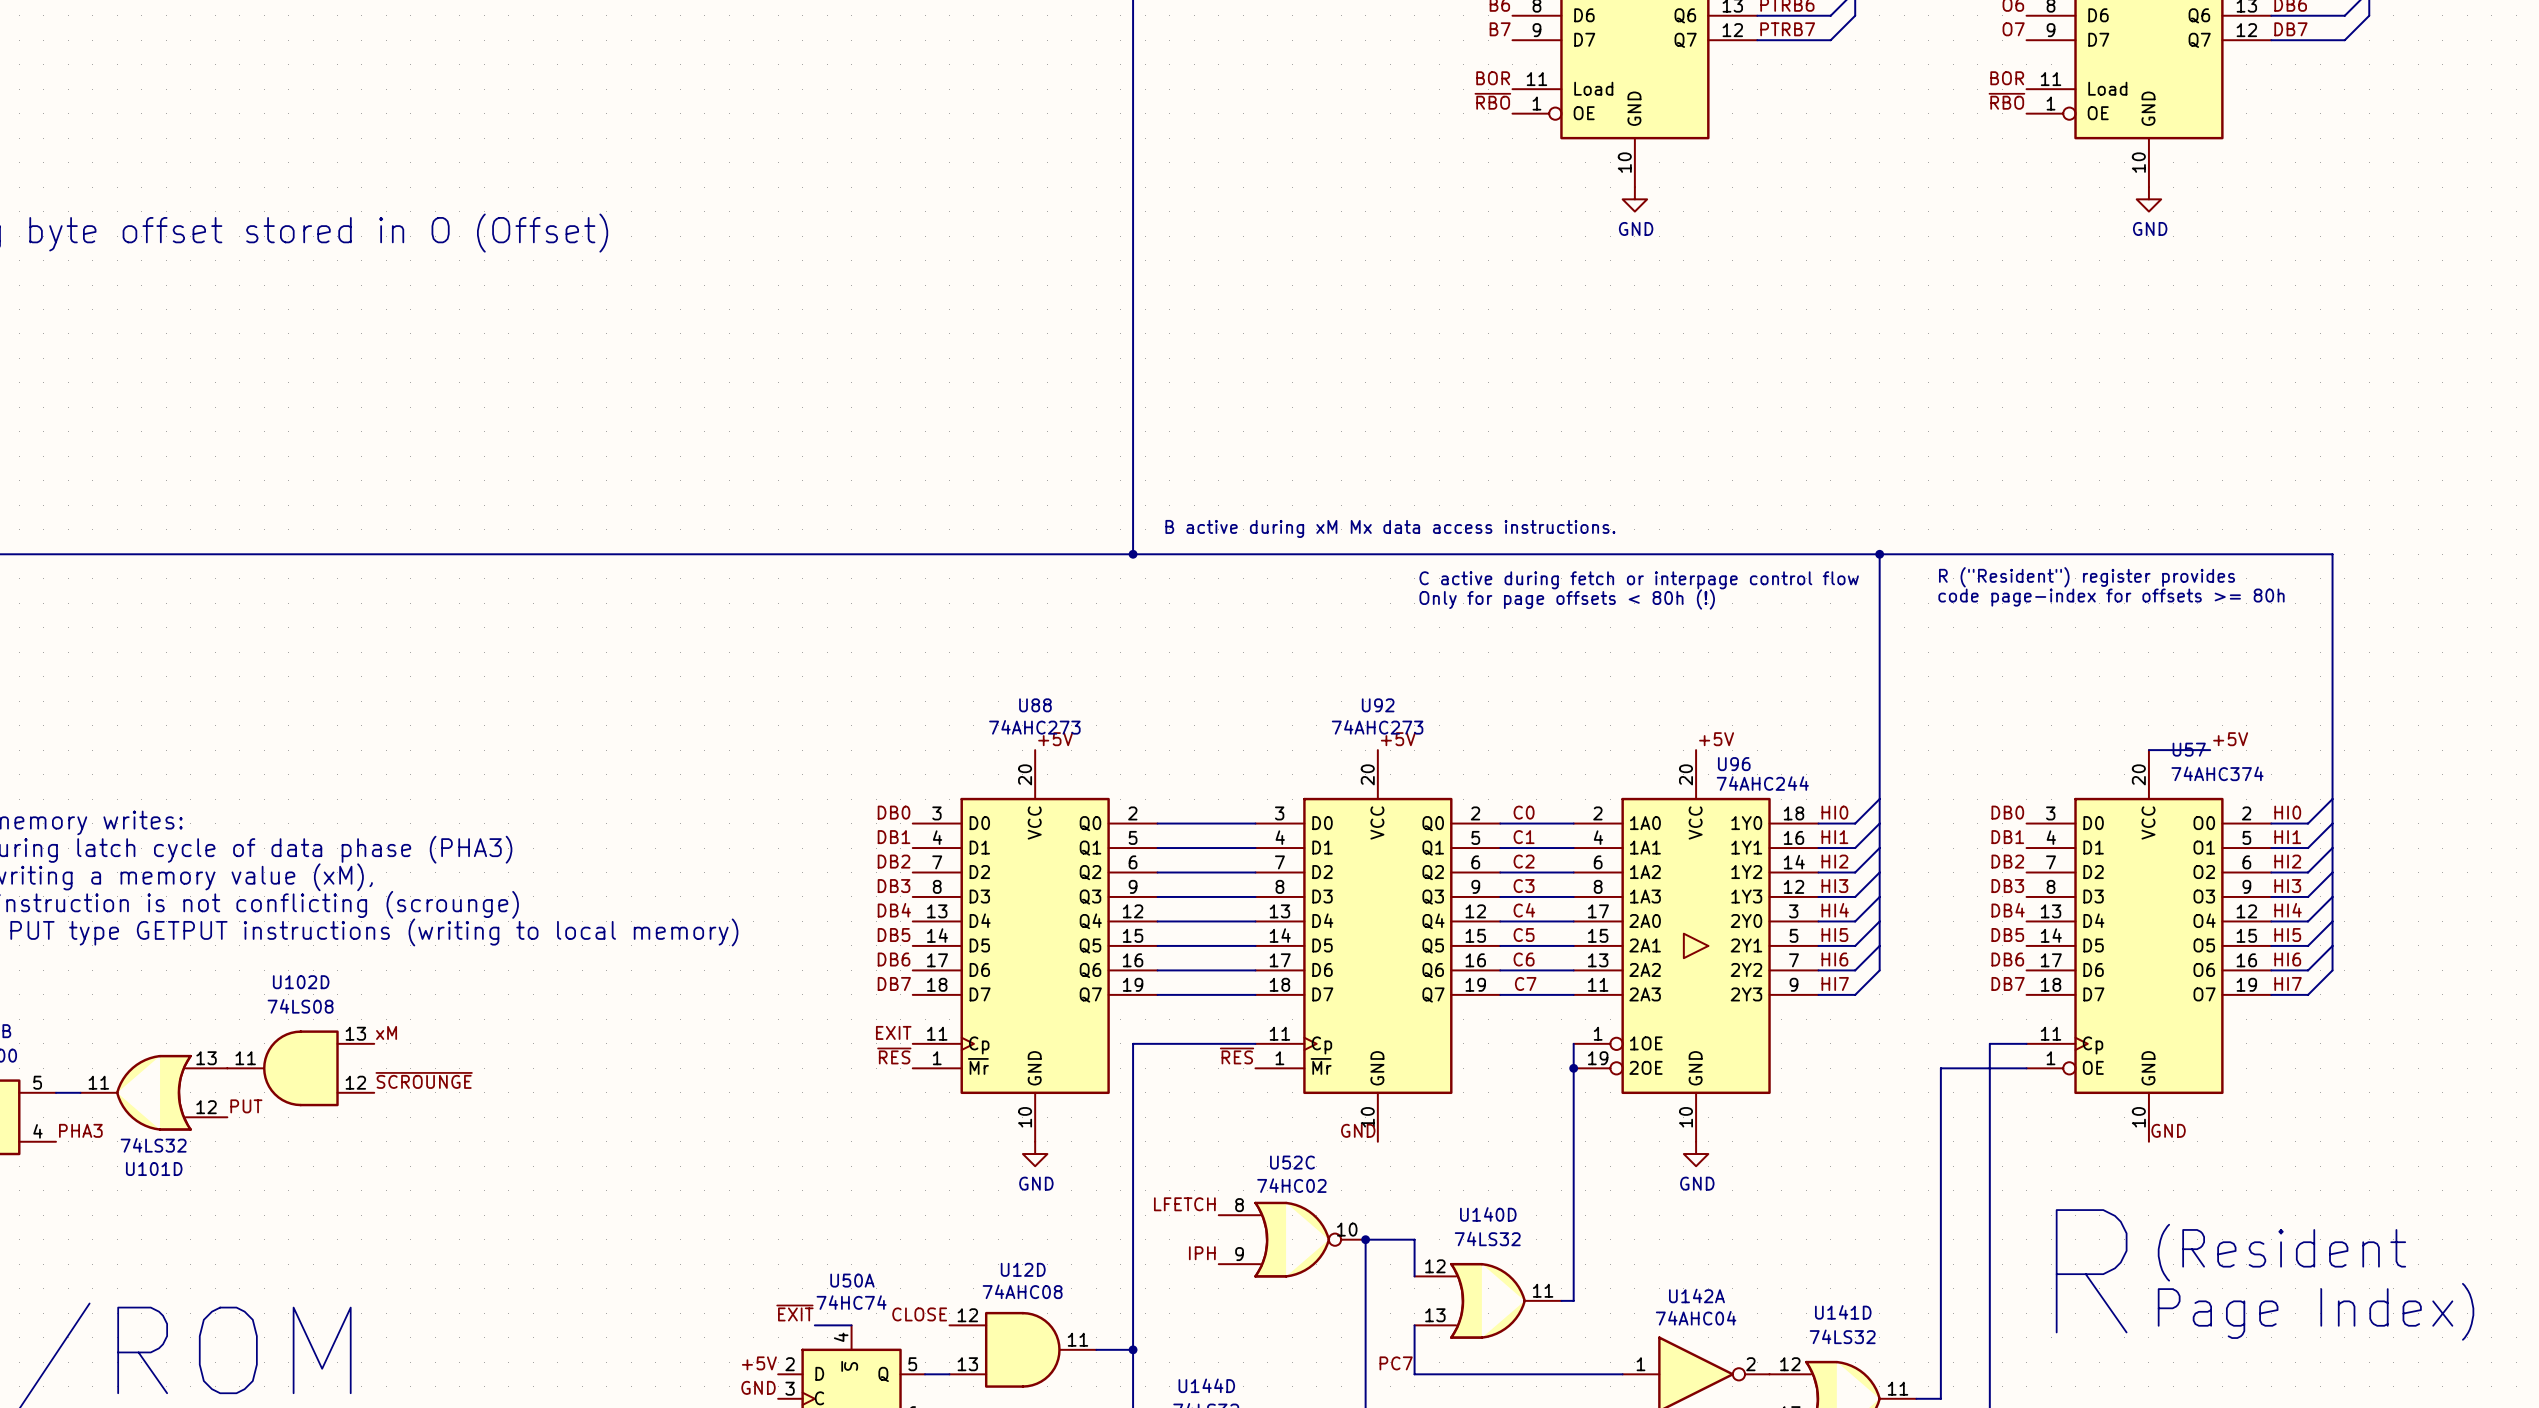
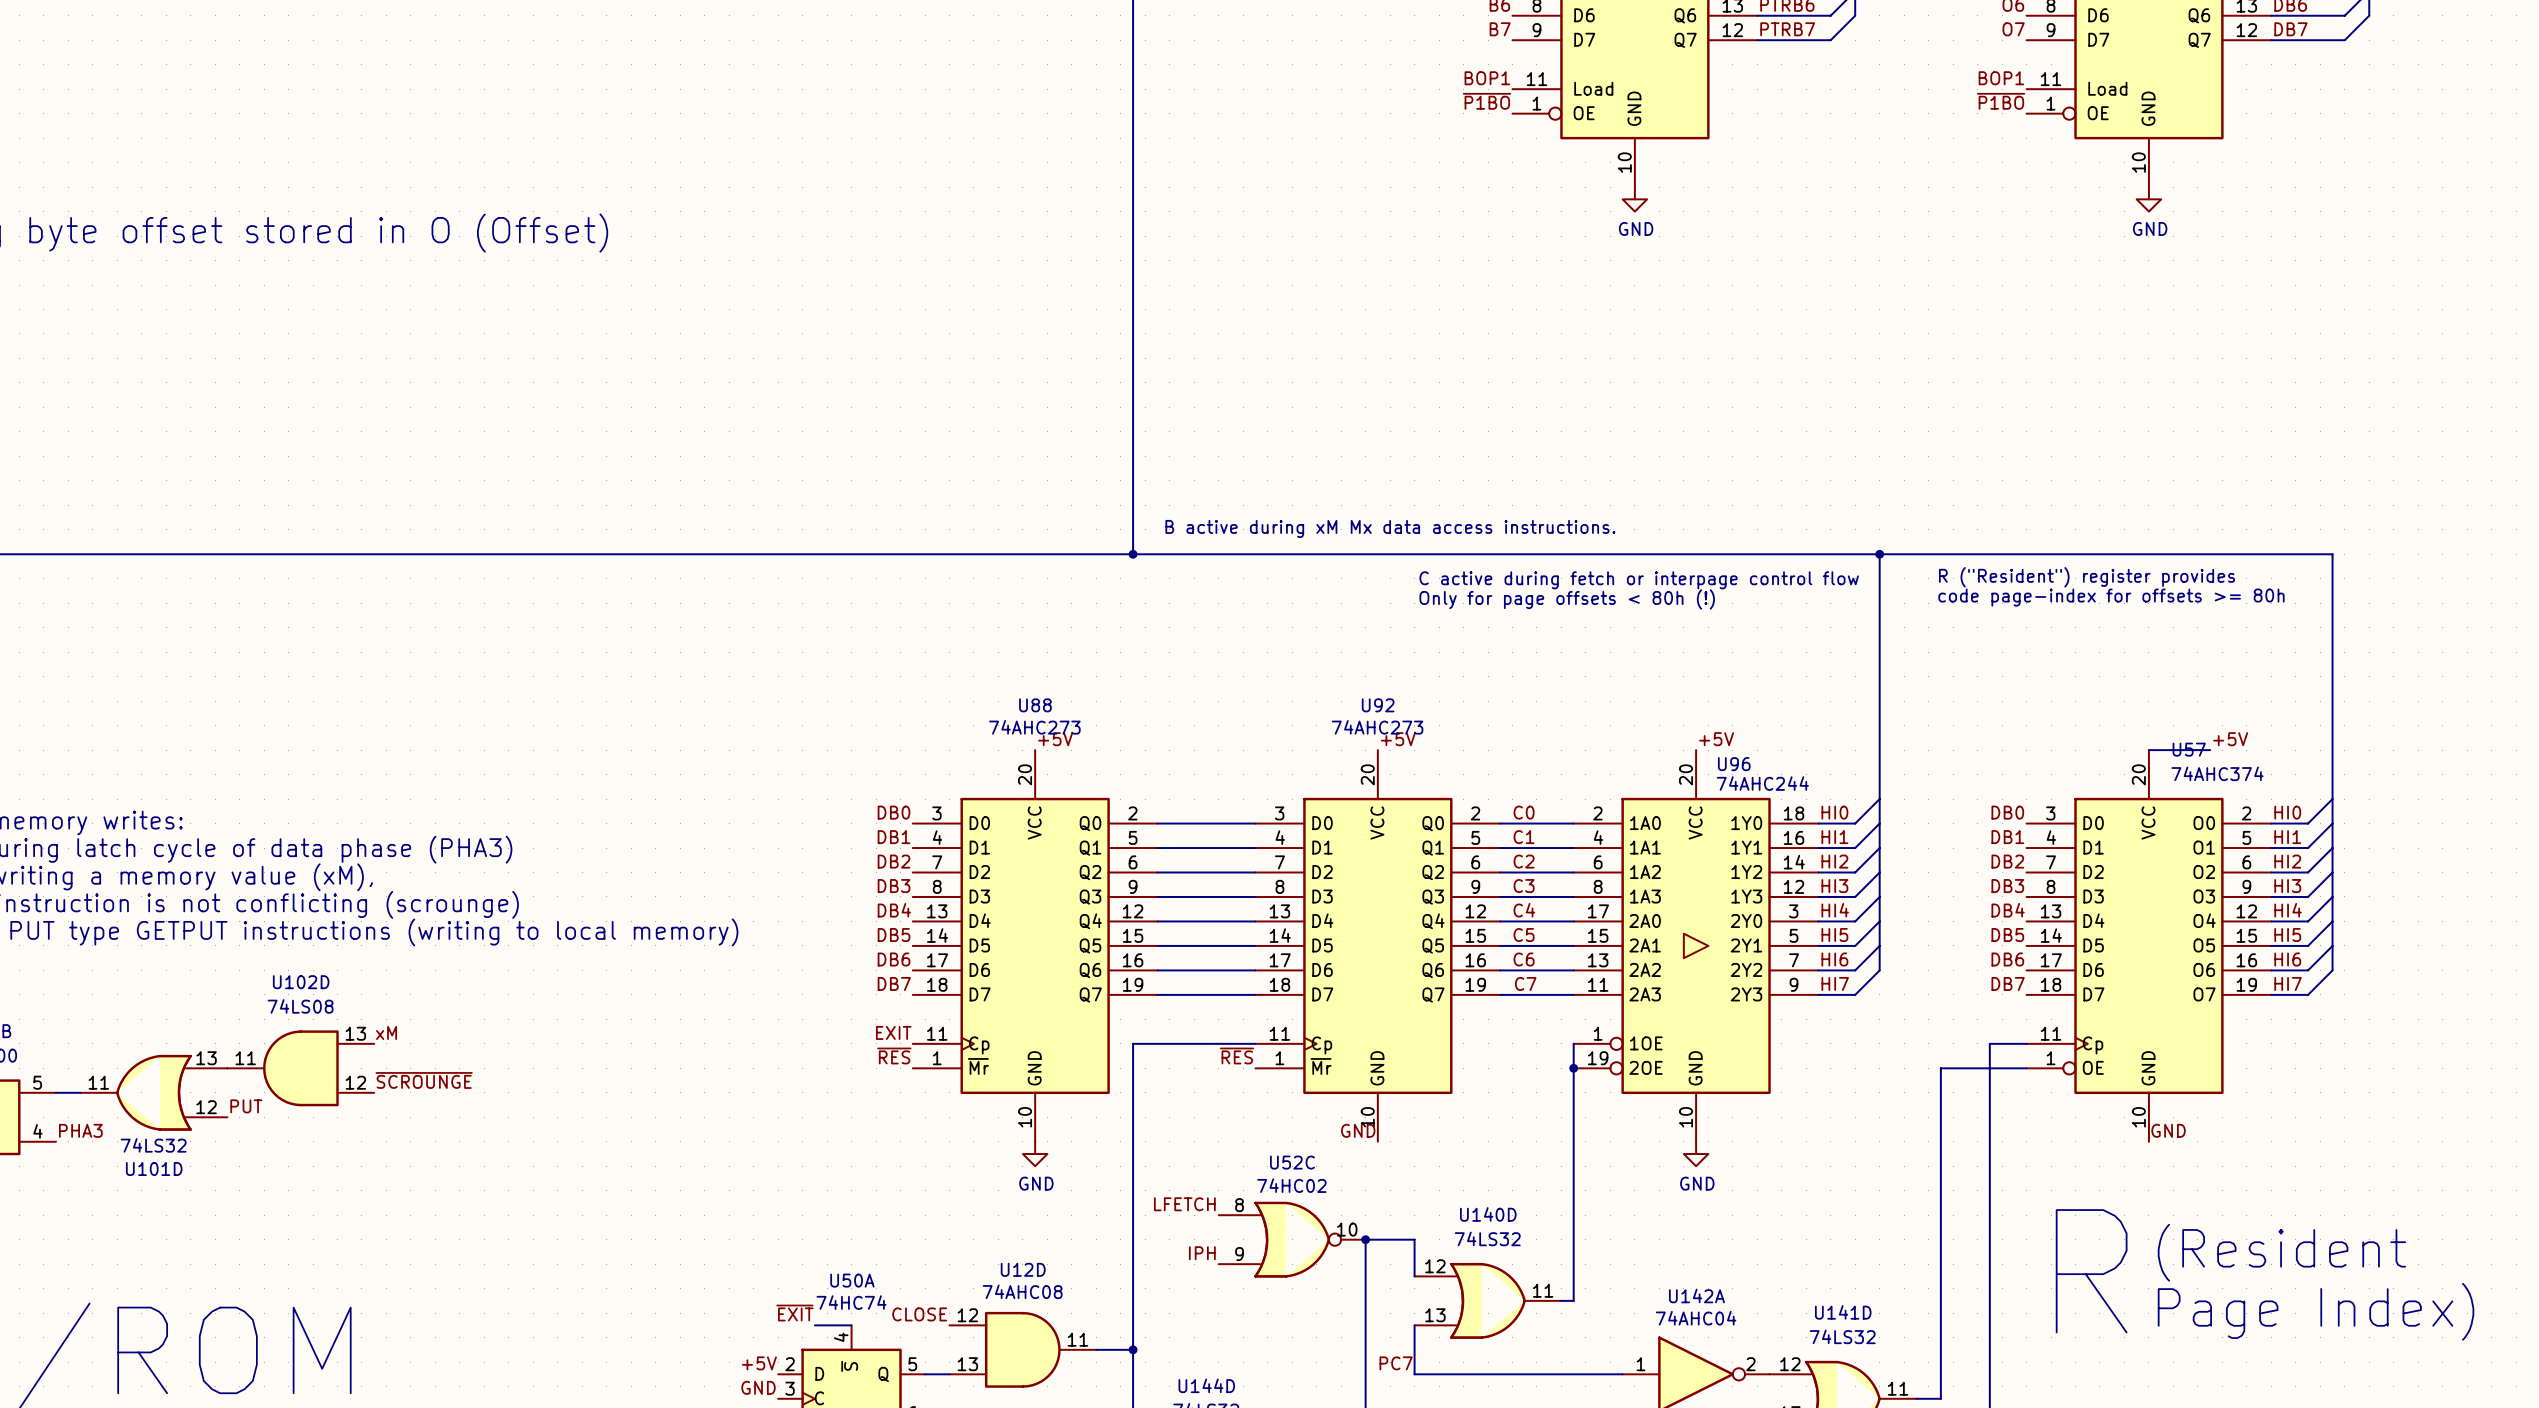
label: BOR (1493, 78) -> BOP1 (1487, 78)
label: BOR (2007, 78) -> BOP1 (2001, 78)
label: ~{RBO} (1492, 101) -> ~{P1BO} (1487, 101)
label: ~{RBO} (2006, 101) -> ~{P1BO} (2001, 101)

